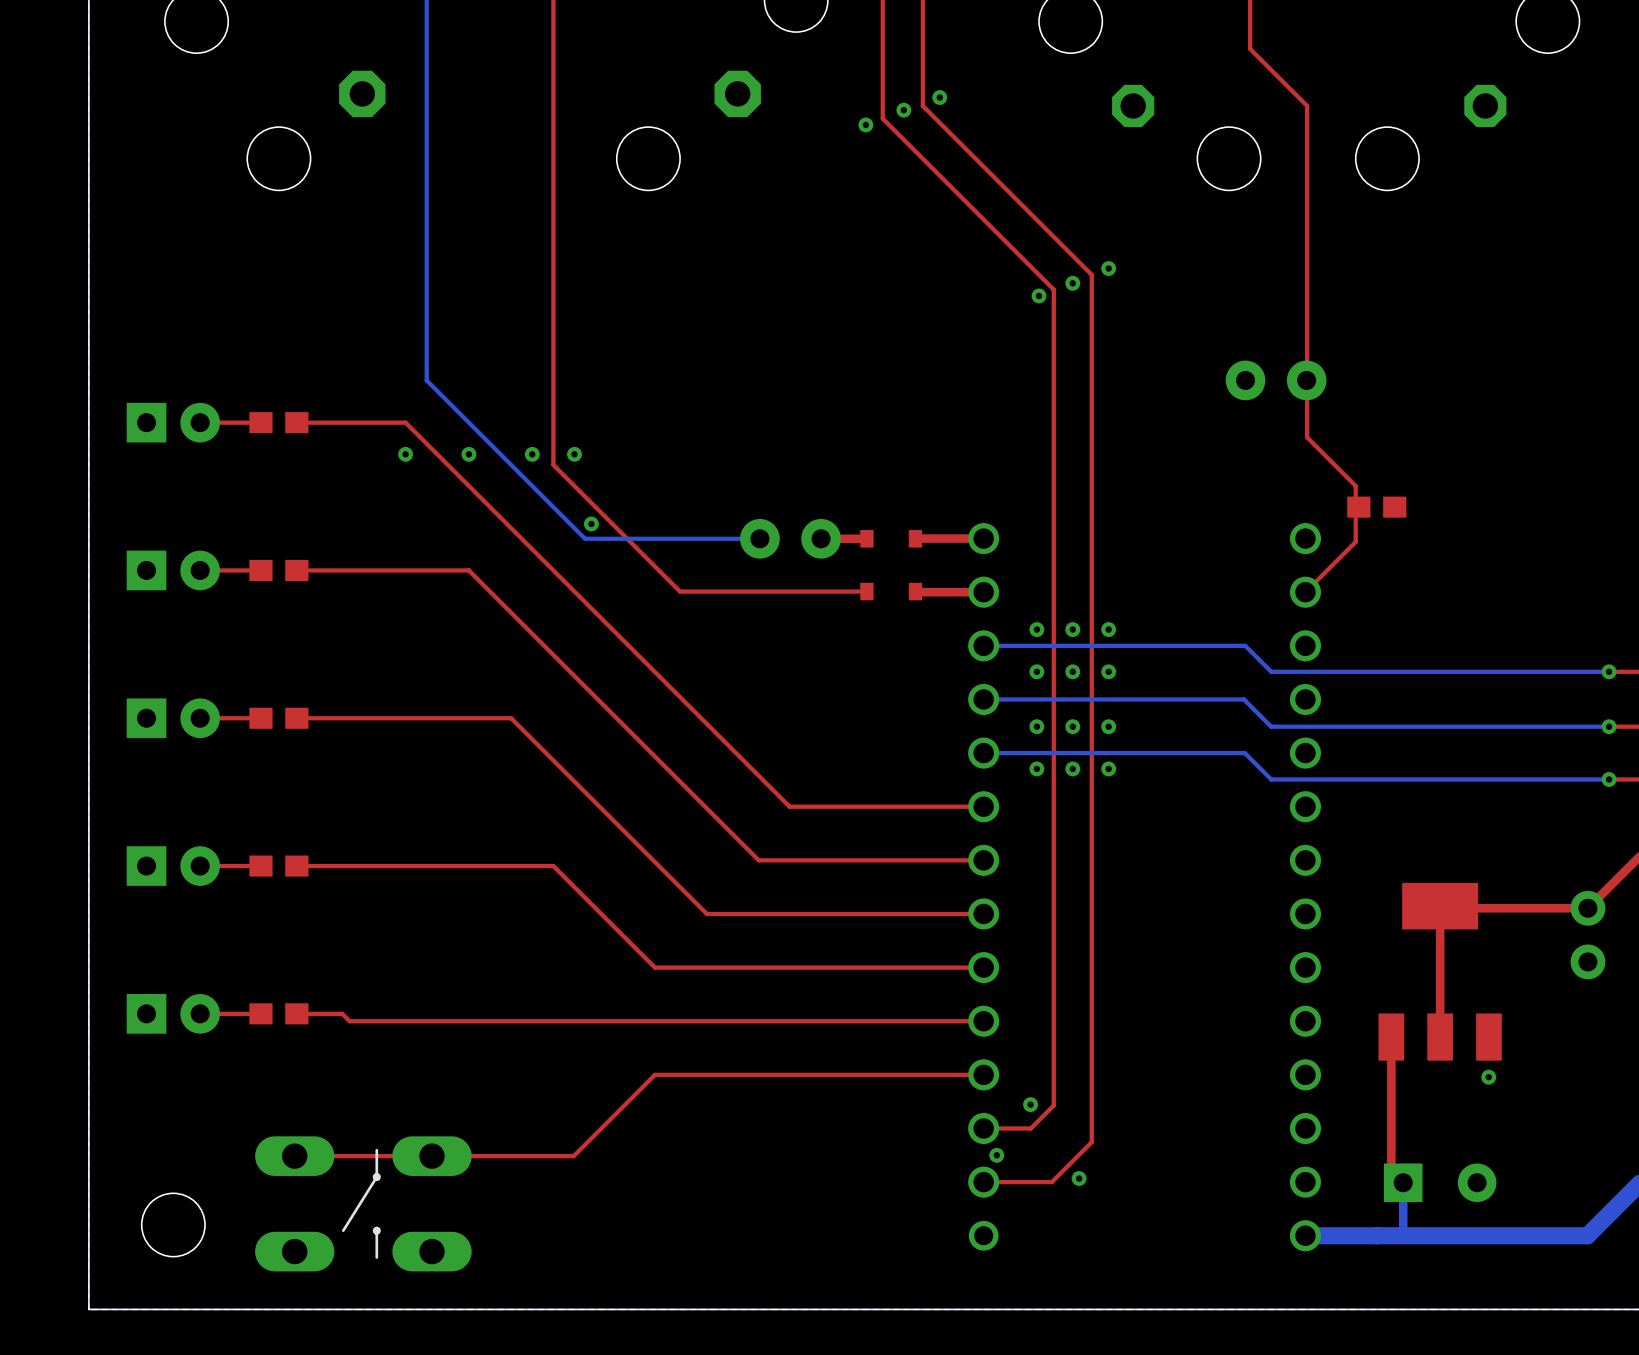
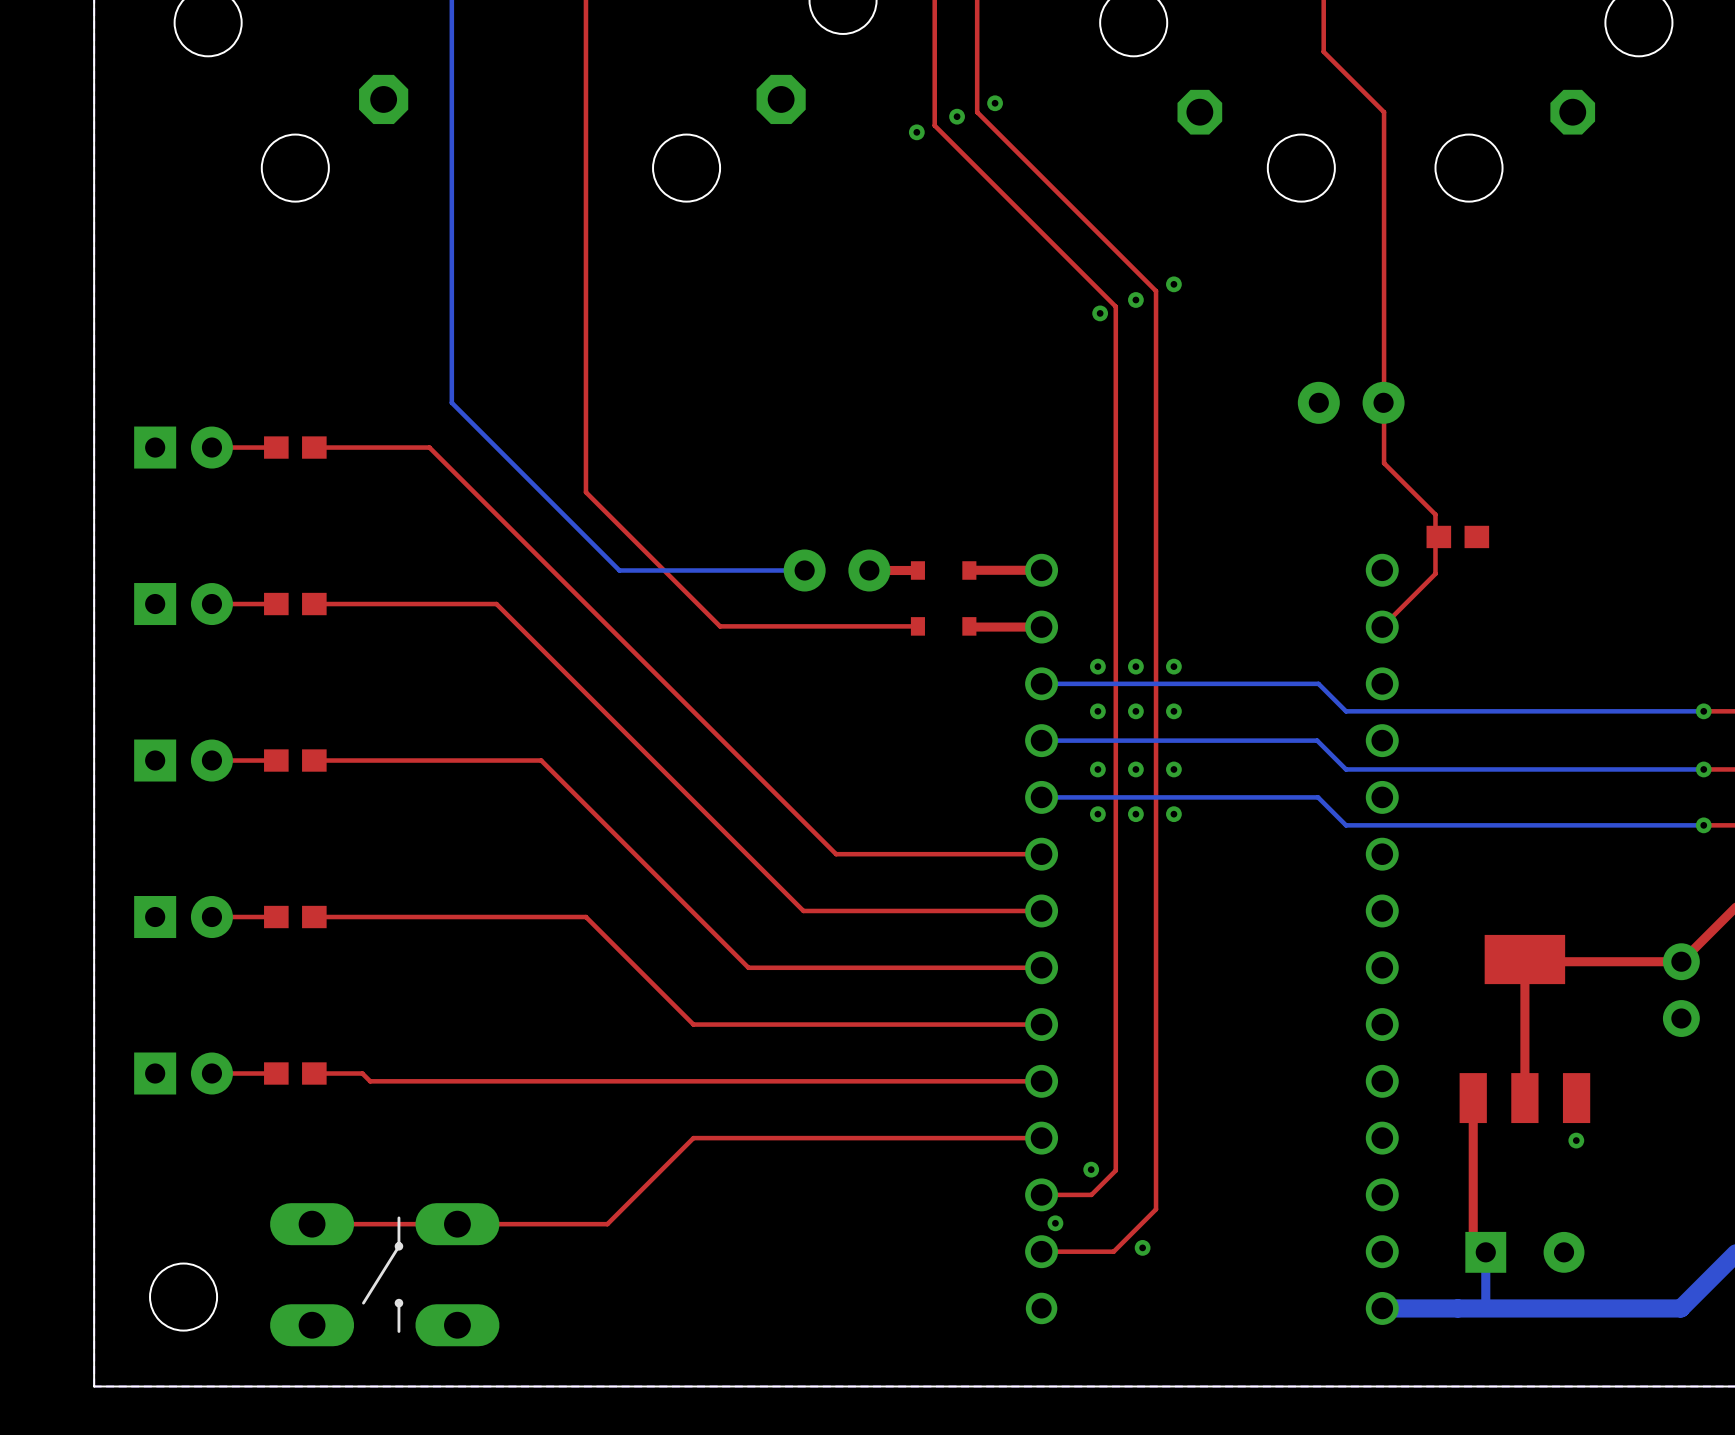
via: (405, 454) -> none
via: (468, 454) -> none
via: (532, 454) -> none
via: (574, 454) -> none
via: (591, 524) -> none

